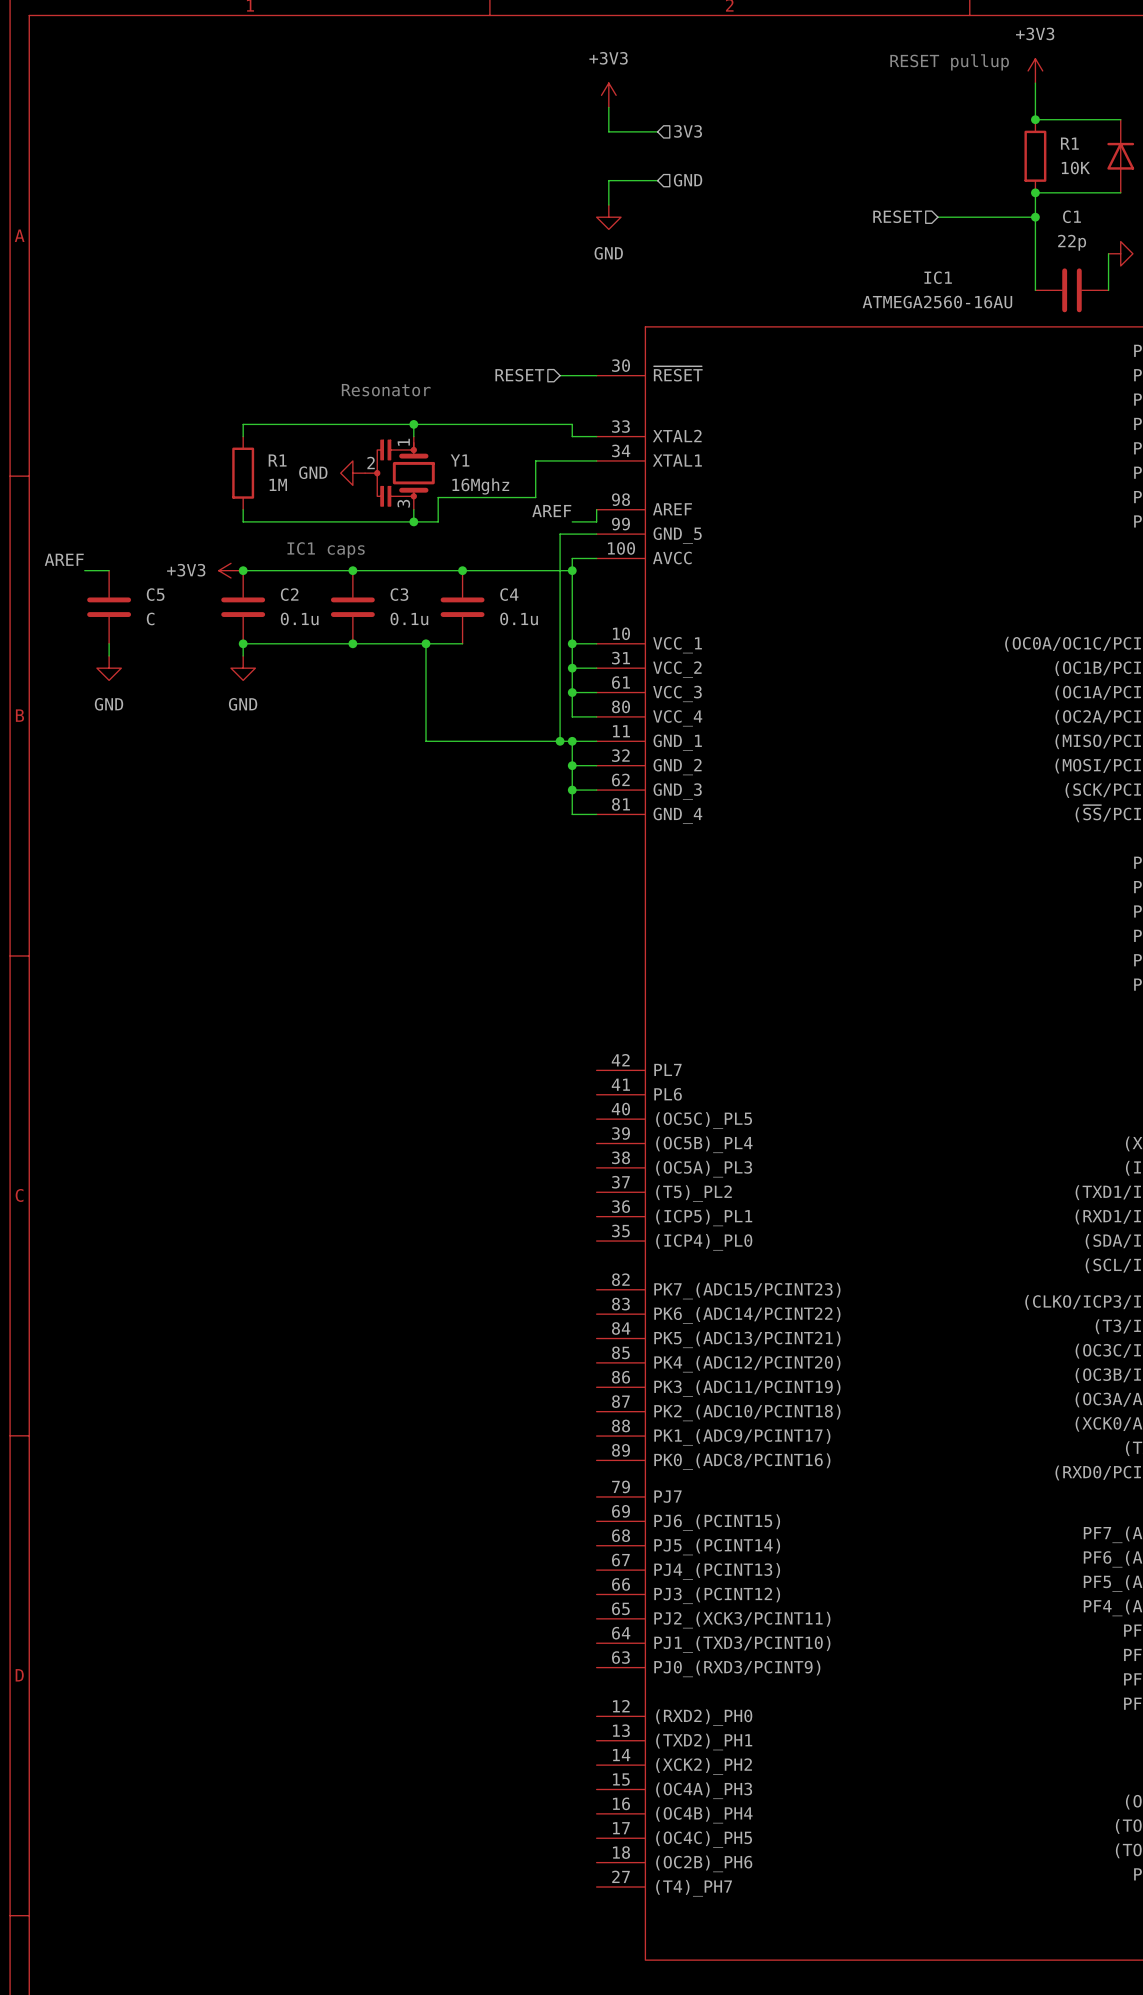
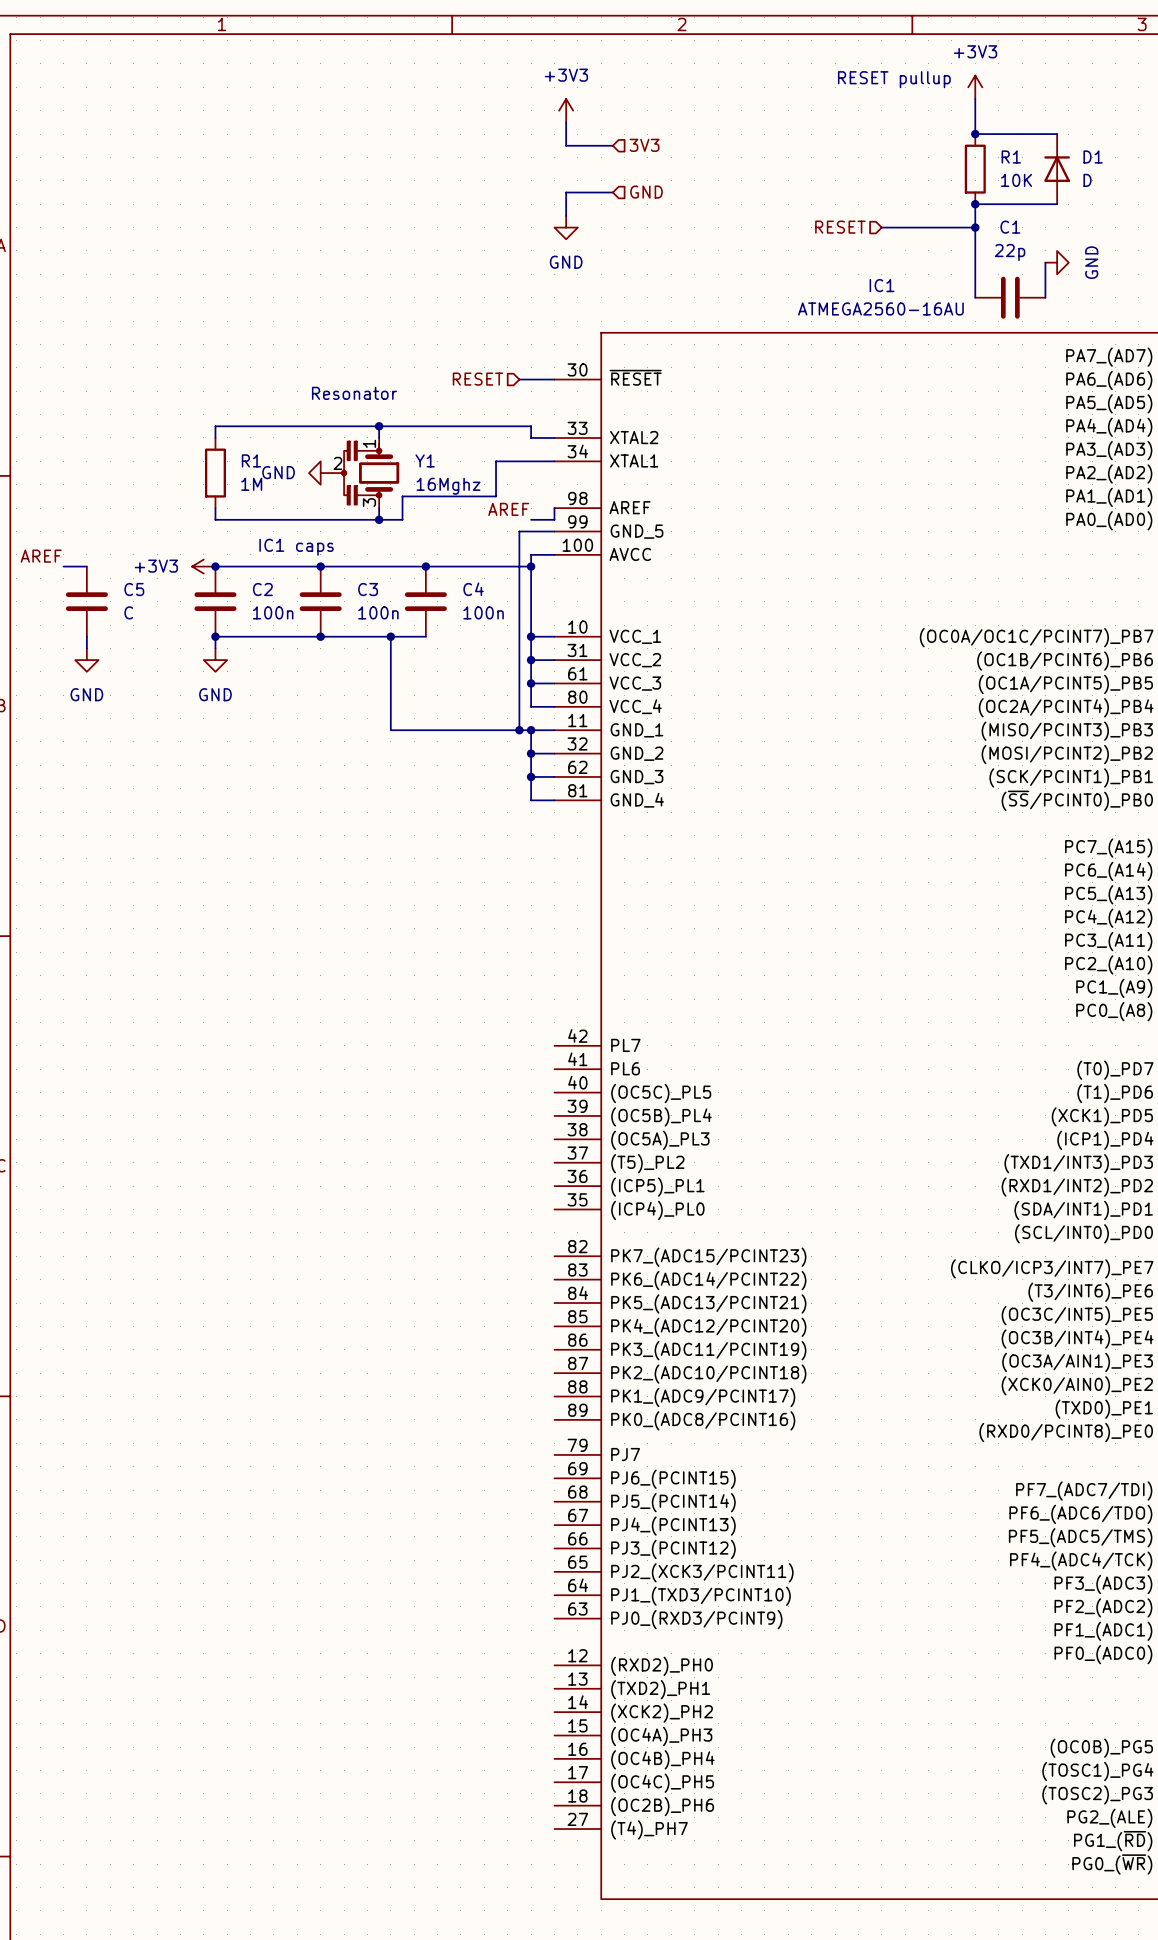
C2 value: 0.1u (299, 618) -> 100n (273, 612)
C3 value: 0.1u (409, 618) -> 100n (378, 612)
C4 value: 0.1u (519, 618) -> 100n (483, 612)

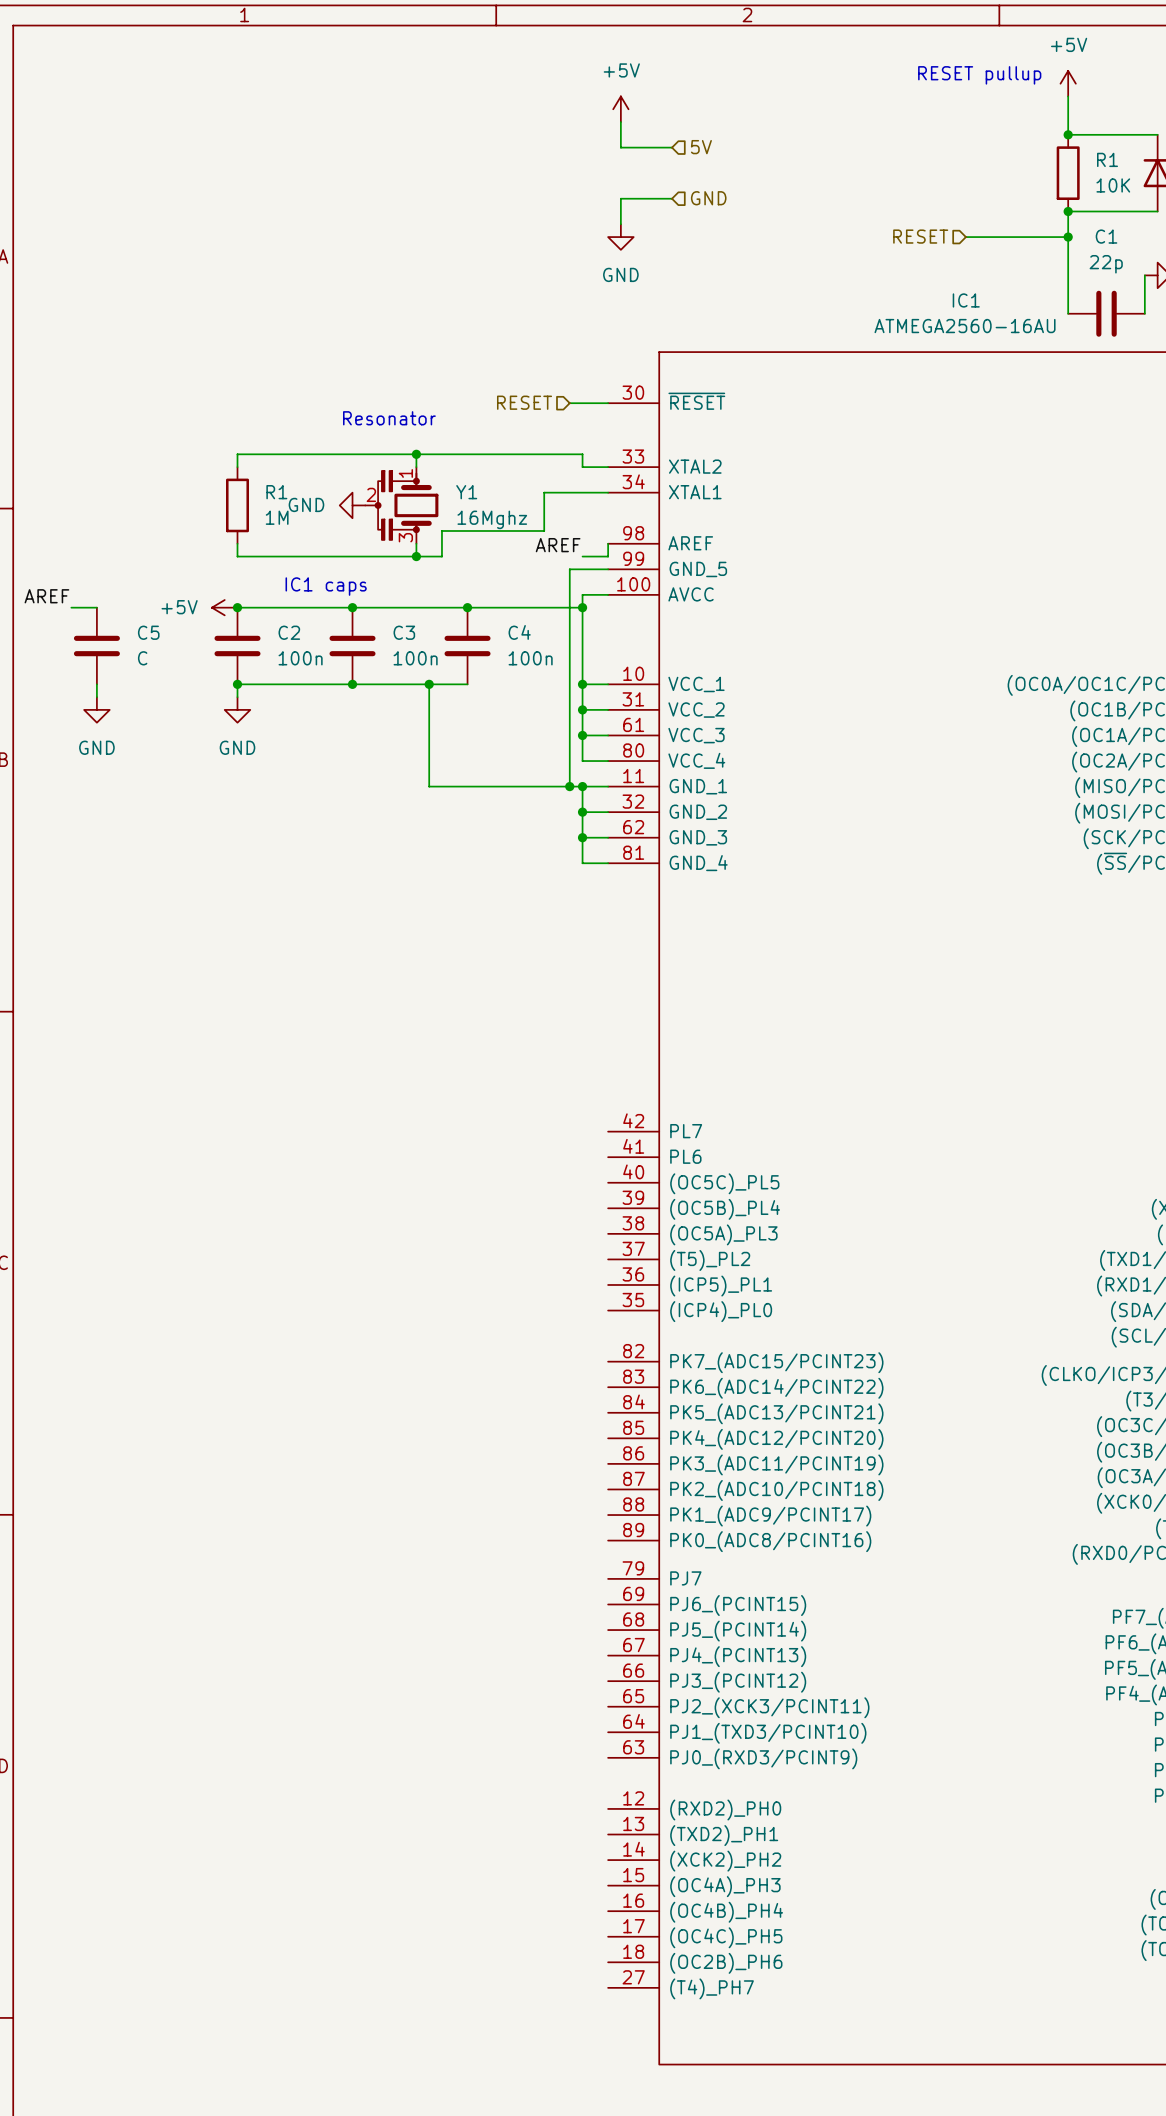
power symbol: +3V3 (975, 87) -> +5V (1068, 83)
power symbol: +3V3 (566, 110) -> +5V (620, 109)
hierarchical label: 3V3 (644, 145) -> 5V (701, 147)
power symbol: +3V3 (203, 566) -> +5V (224, 607)

